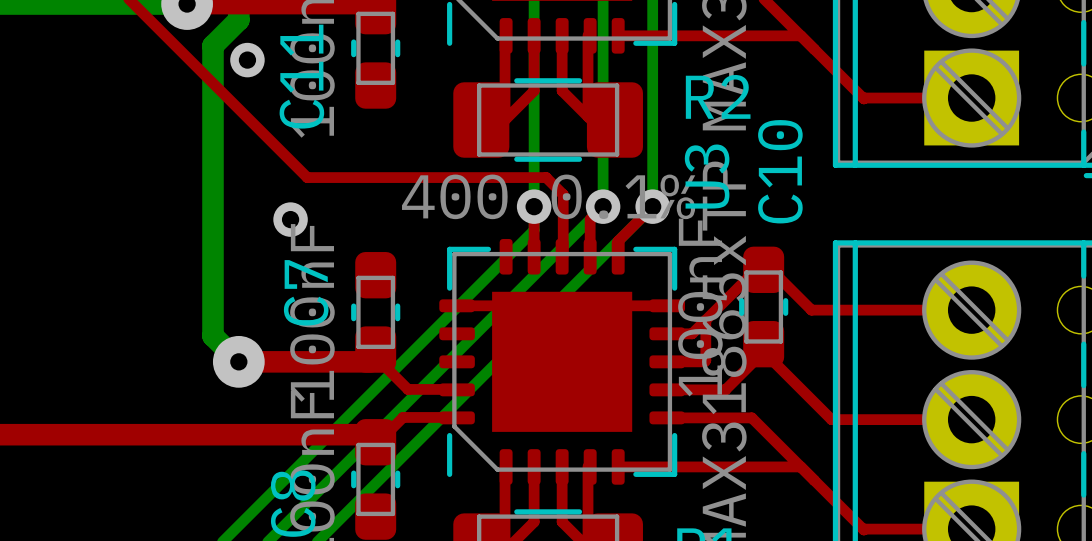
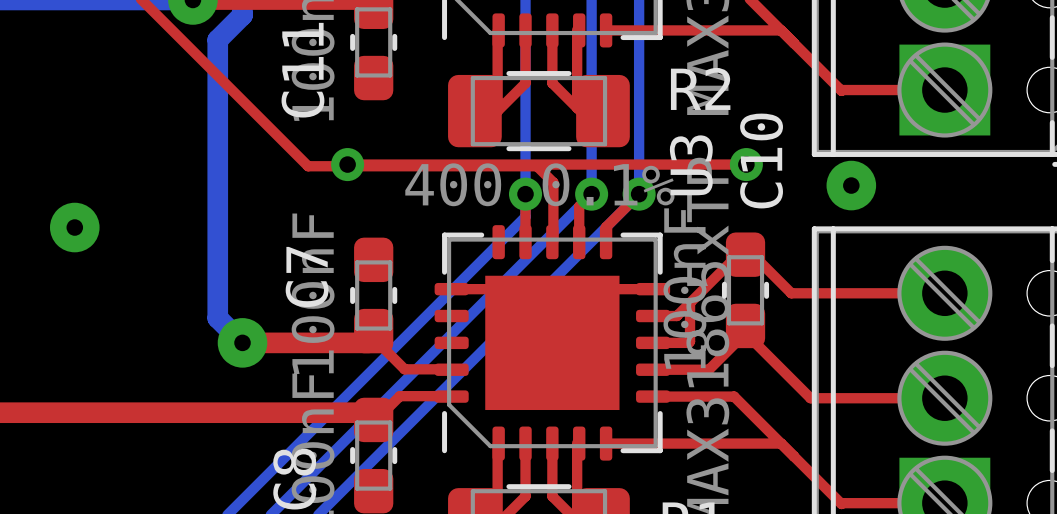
via: (247, 60) -> none
top track: none -> (347, 164) (746, 164)
via: none -> (746, 164)
via: none -> (851, 185)
via position: (290, 219) -> (347, 164)
via: none -> (74, 227)

